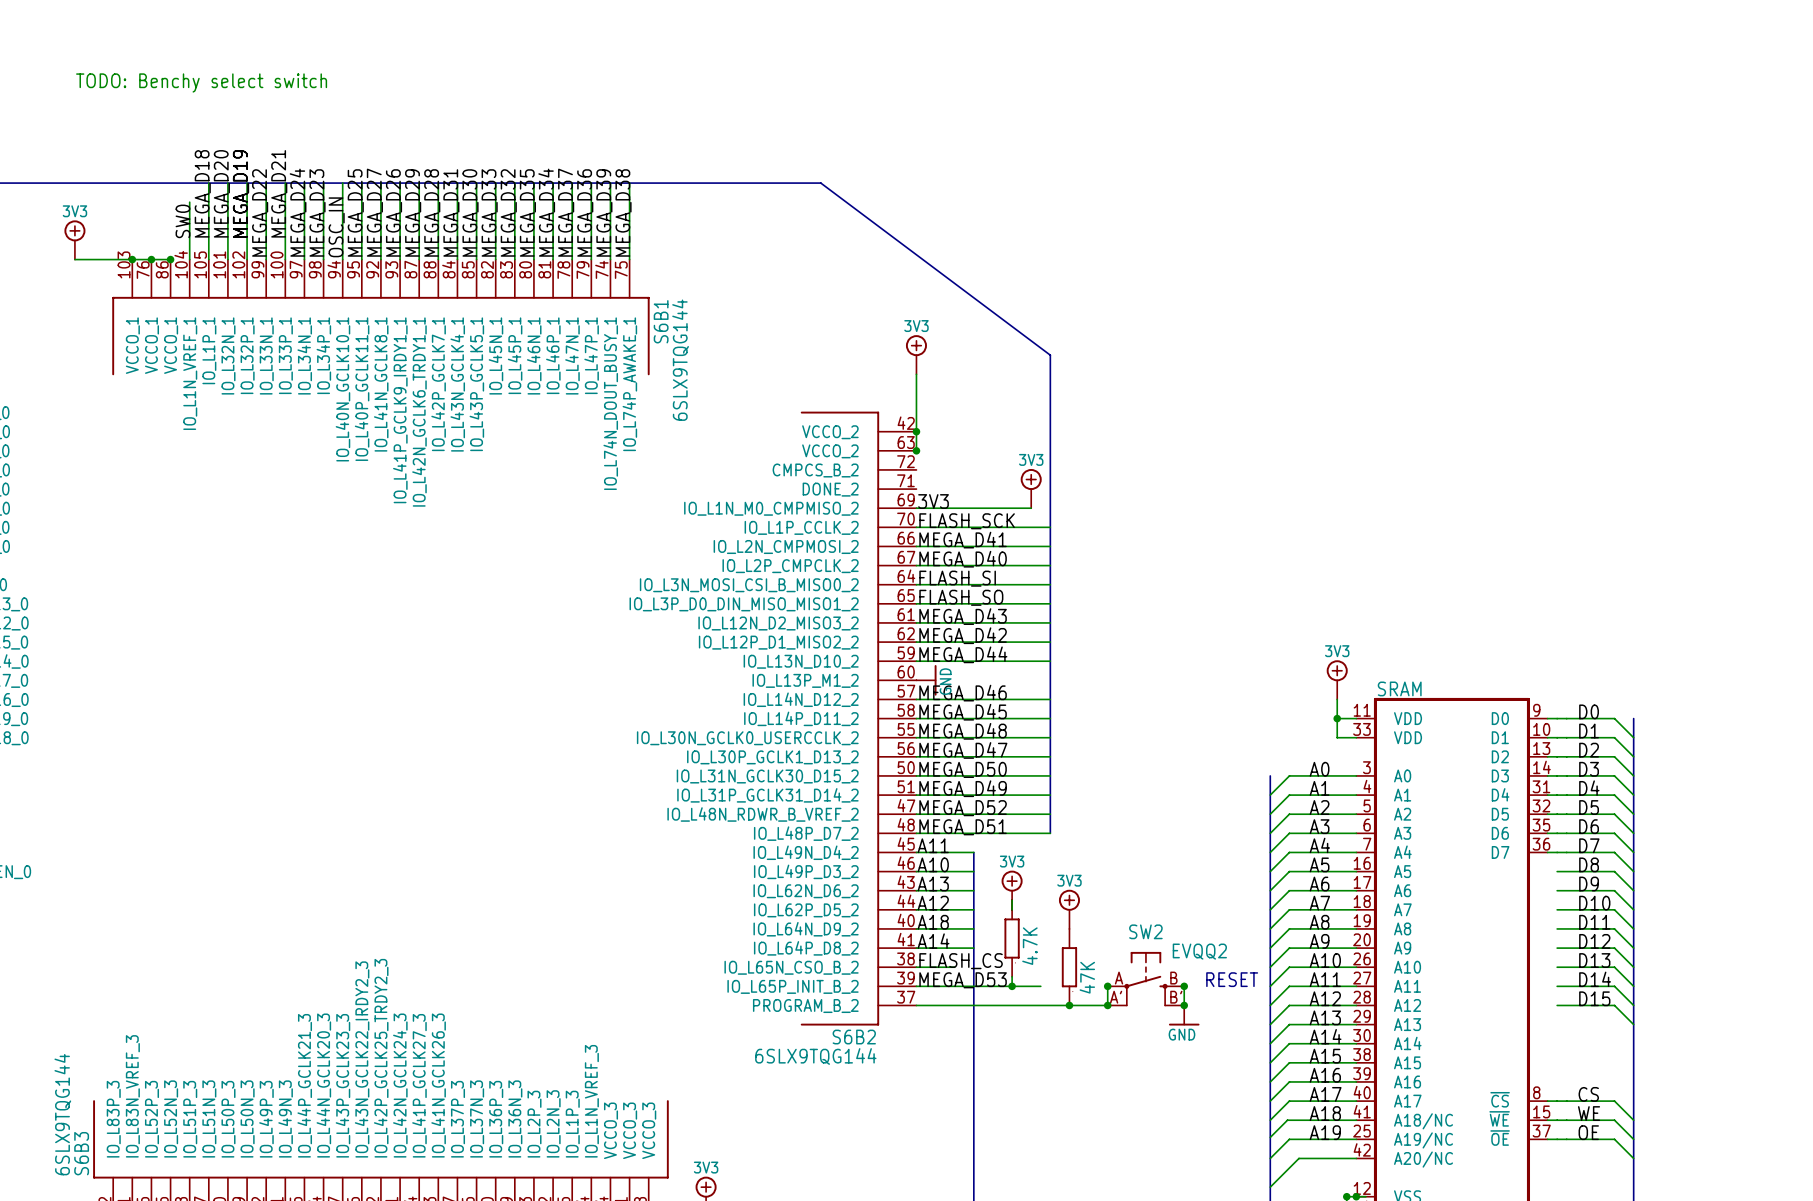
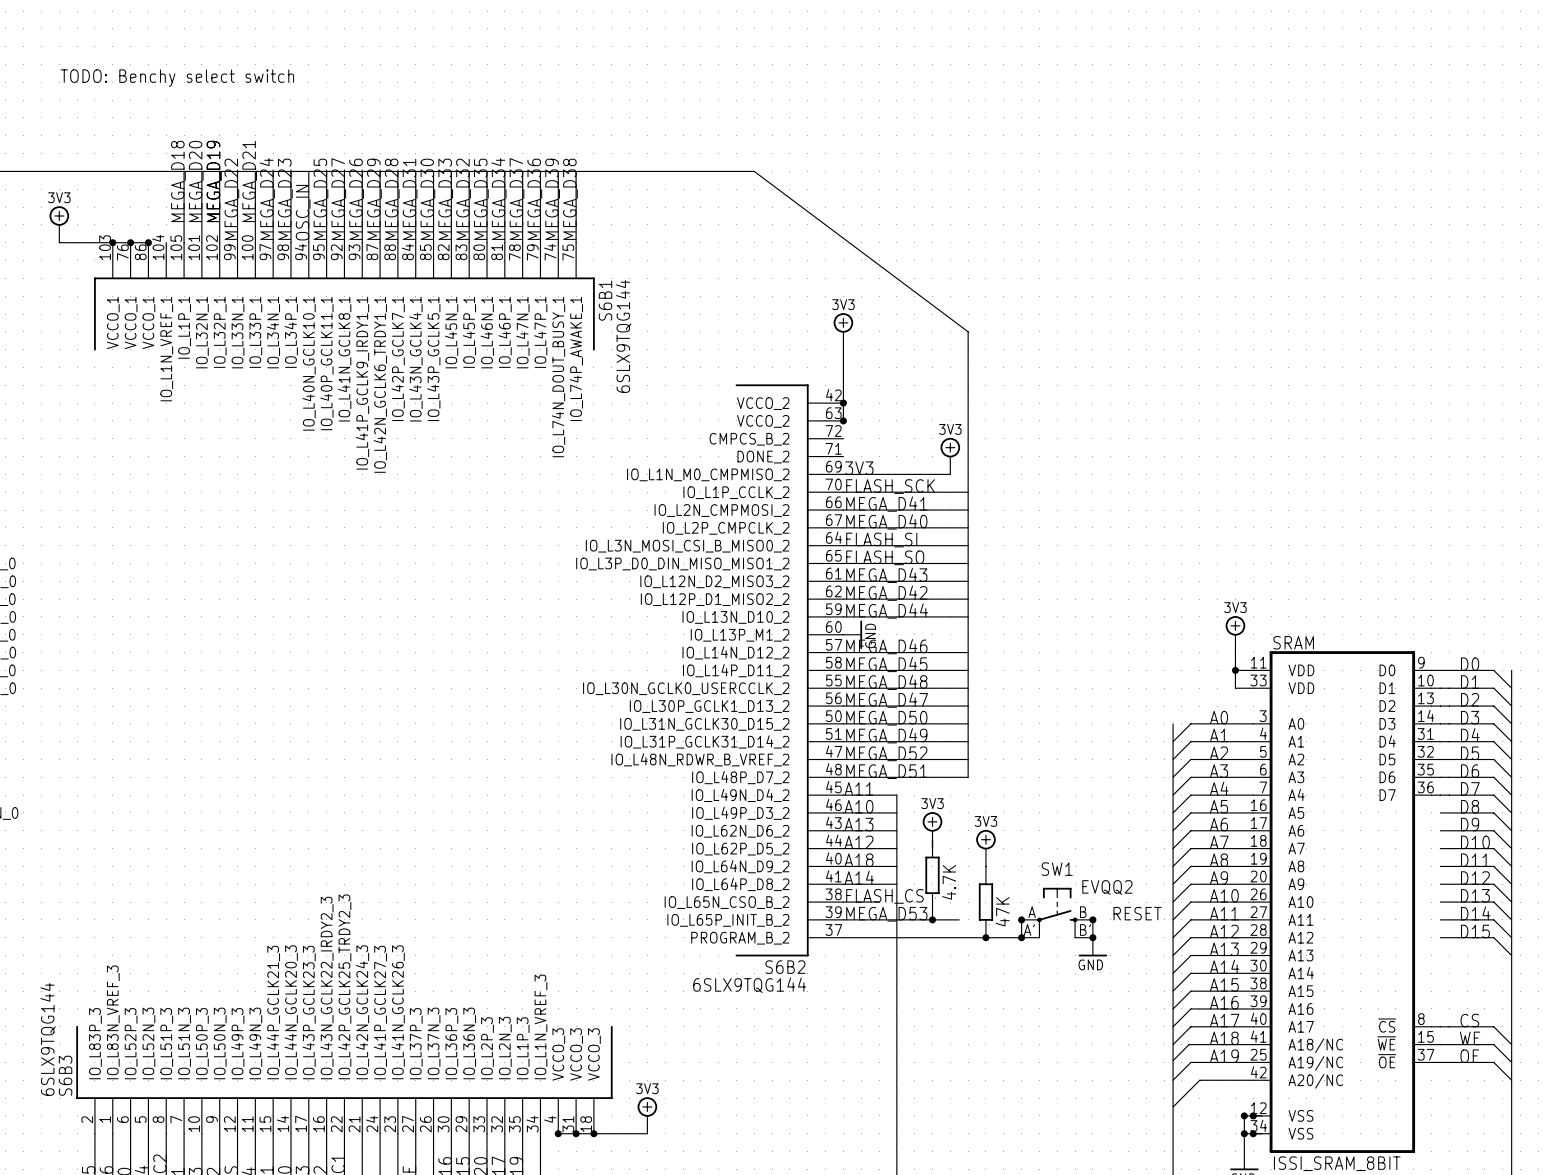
wire: (189, 202) (189, 259) -> none
label: SW0 (182, 221) -> none
SW2 name: SW2 (1145, 931) -> SW1 (1057, 869)

